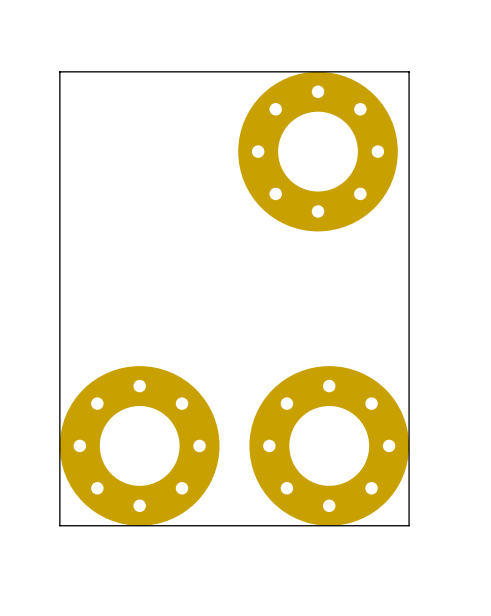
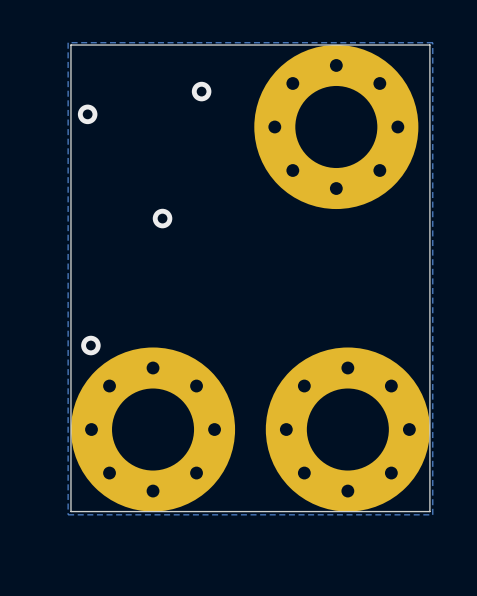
zone outline: none -> (432, 42) (432, 514) (68, 514) (68, 42) (432, 42)
via: none -> (201, 91)
via: none -> (87, 114)
via: none -> (162, 218)
via: none -> (90, 345)

